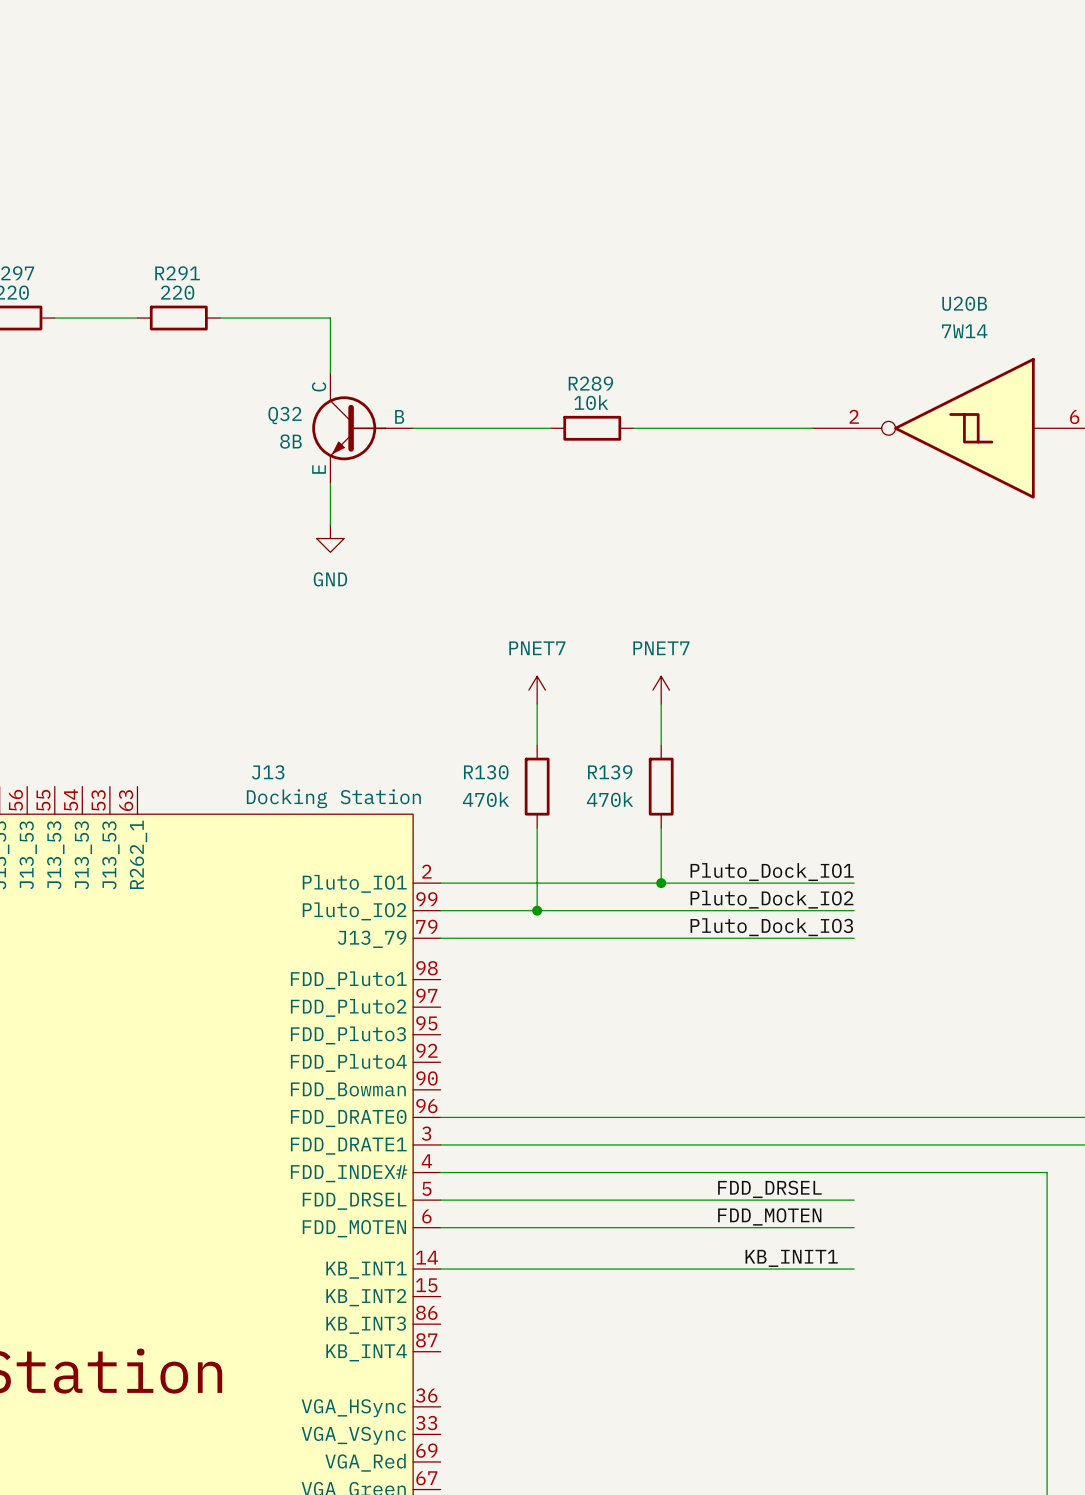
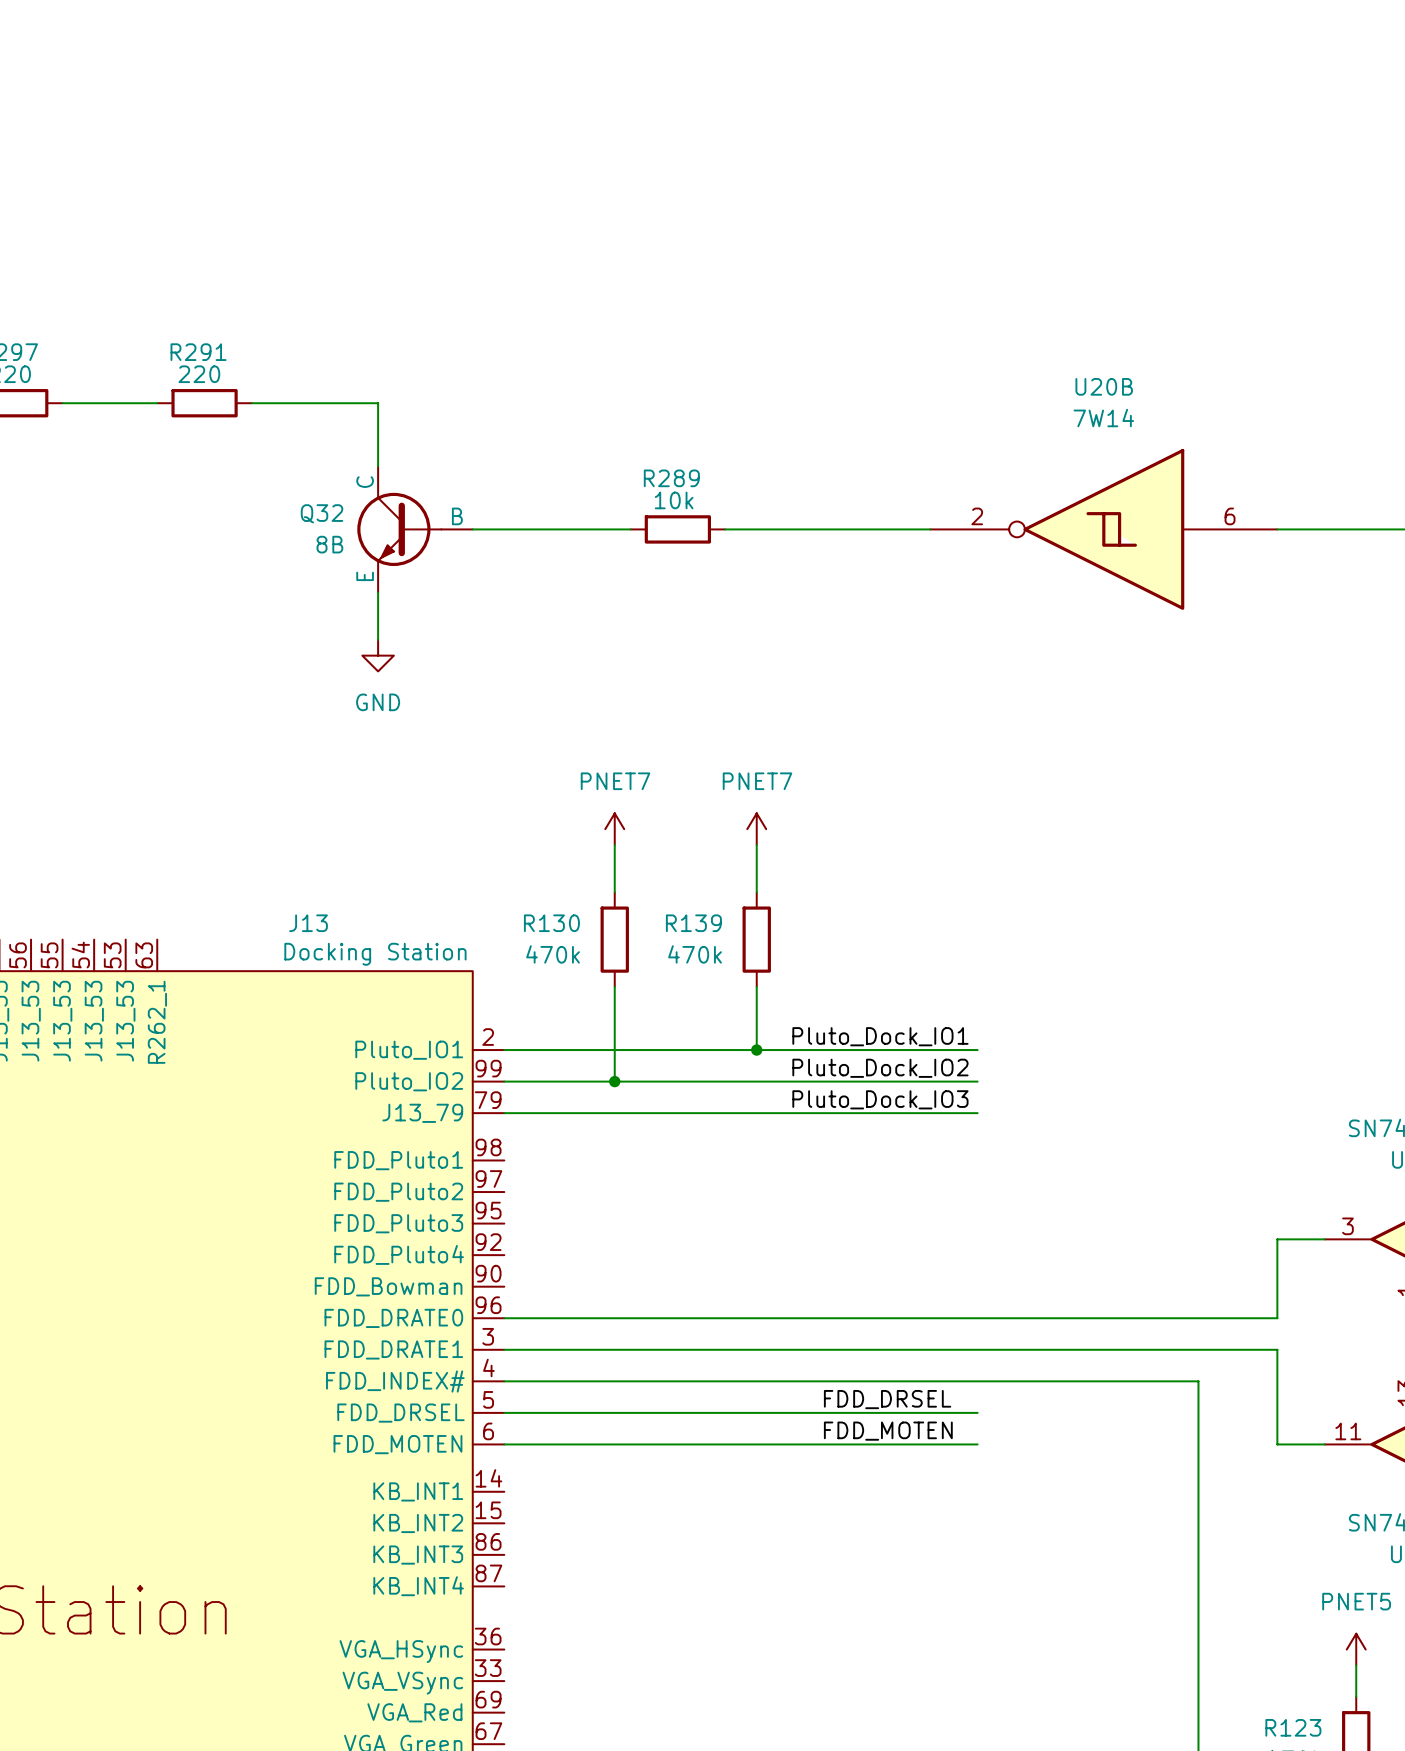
label: KB_INIT1 (791, 1258) -> none
wire: (440, 1269) (854, 1269) -> none

